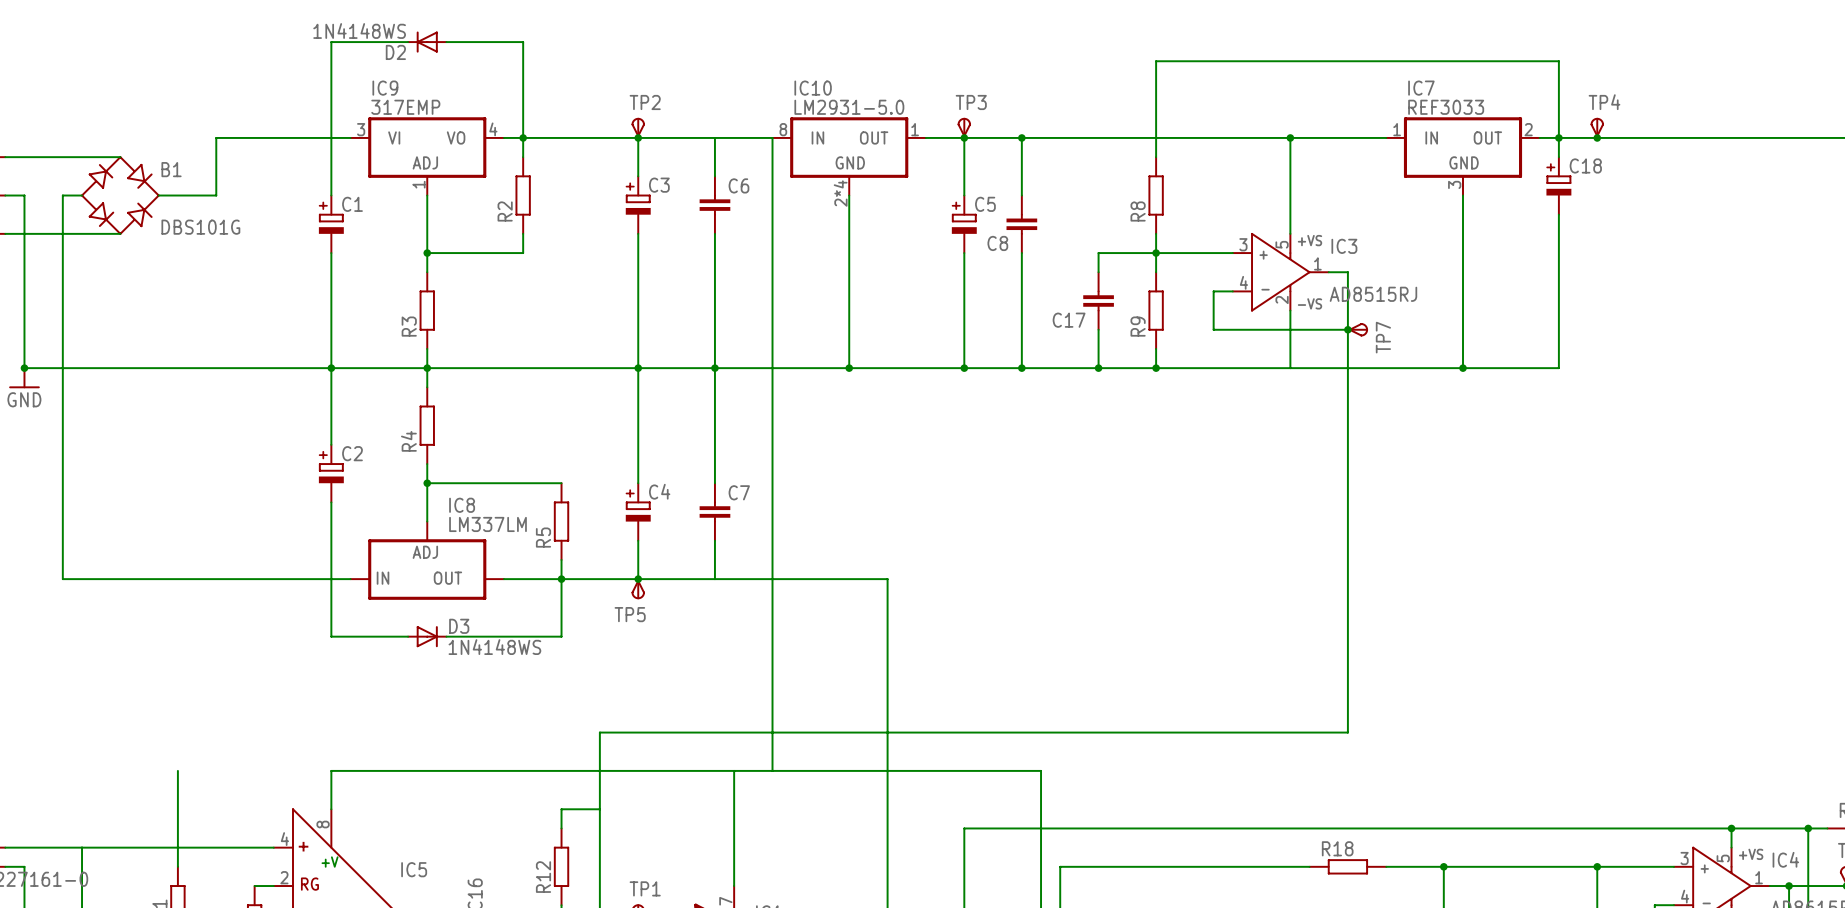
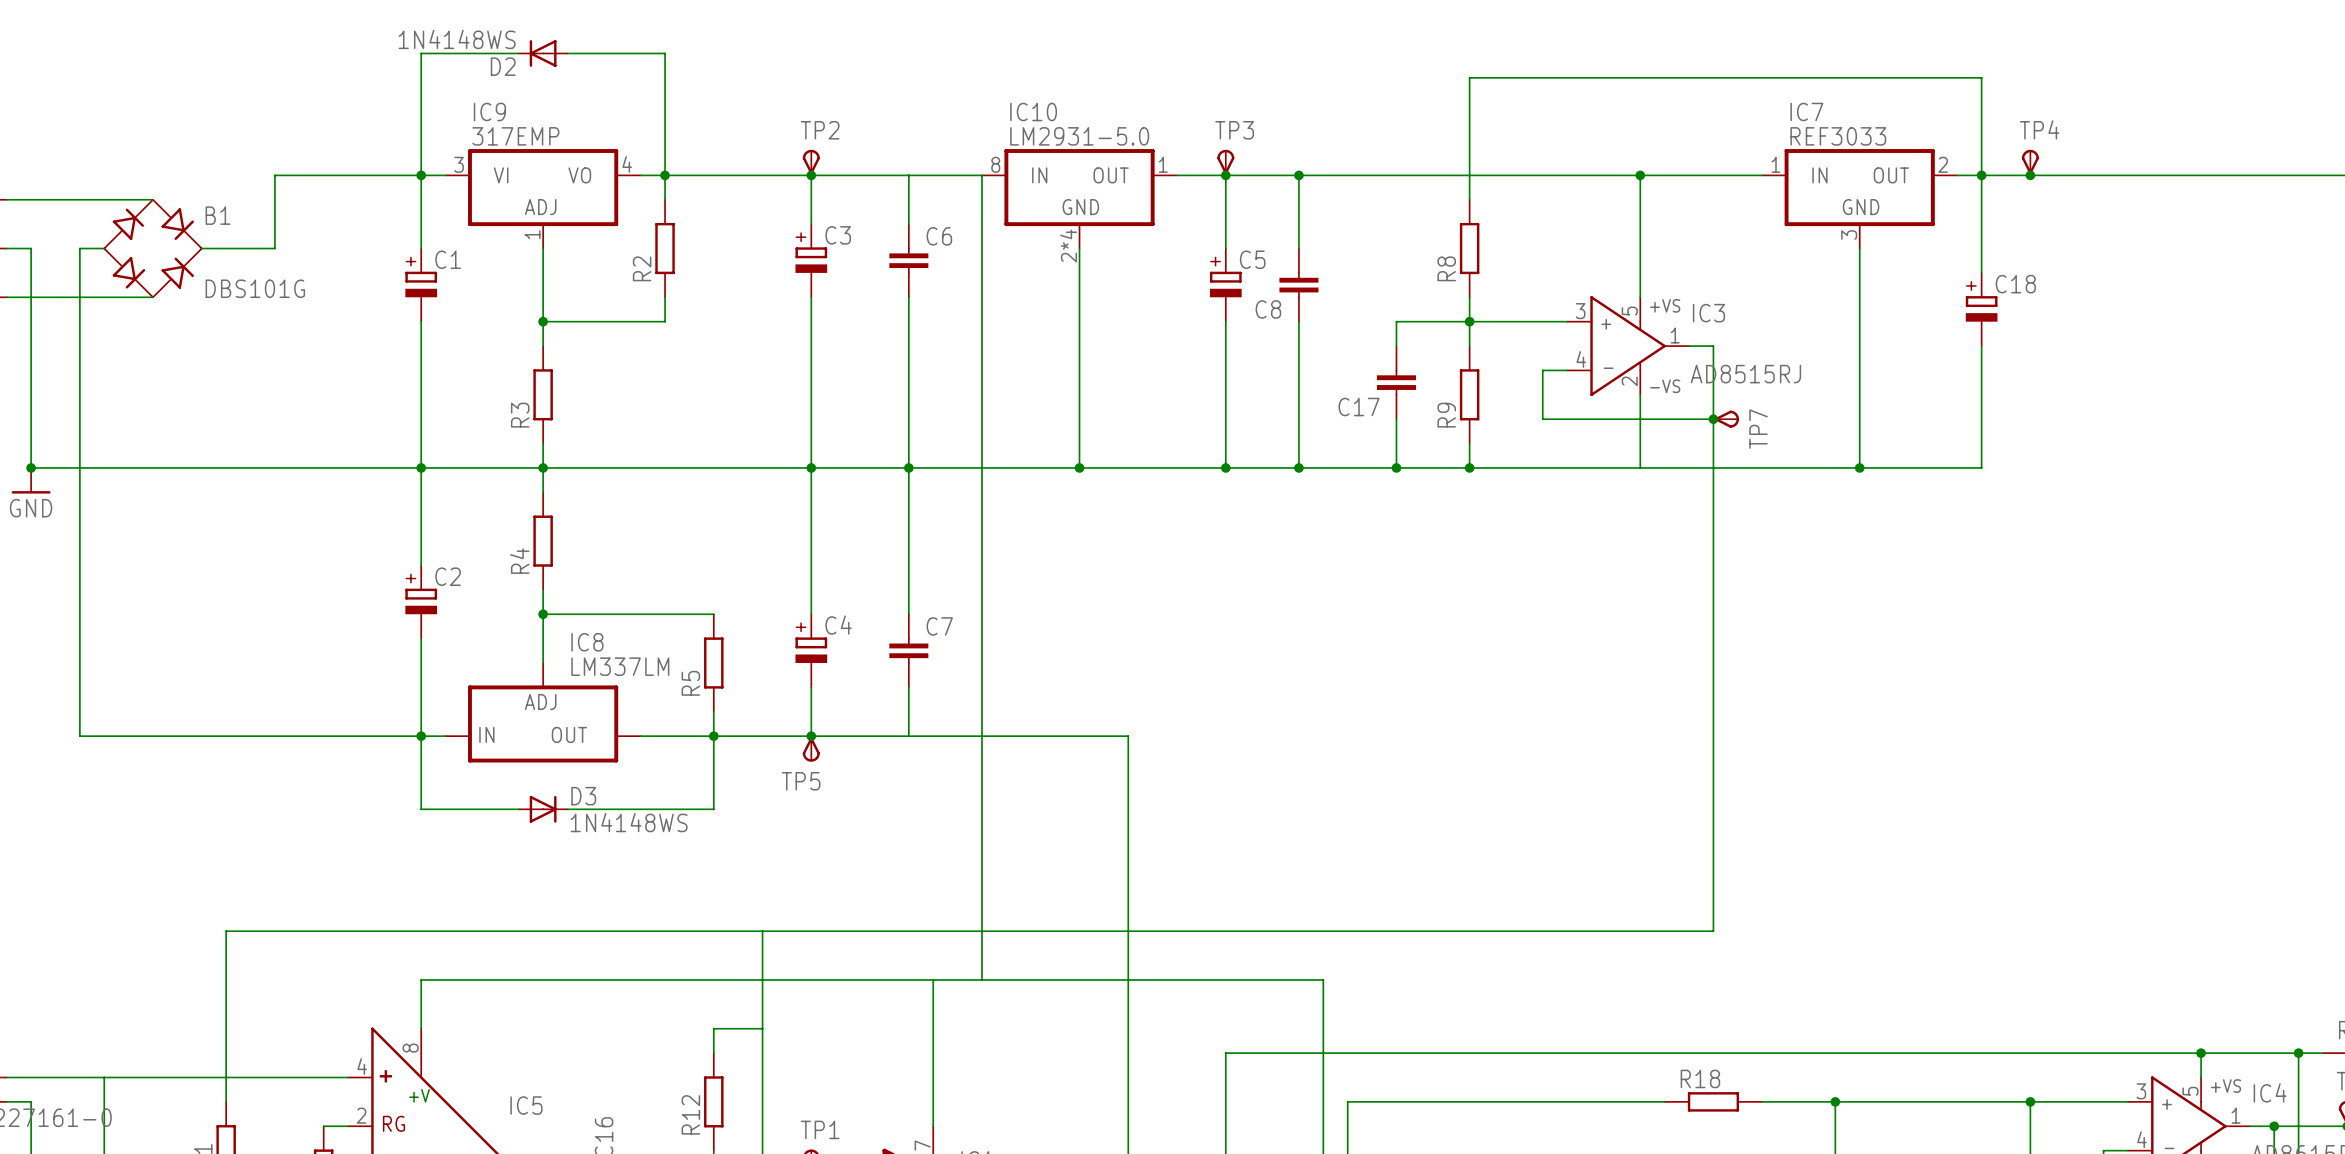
junction: none -> (421, 175)
C18 position: (1558, 185) -> (1981, 309)
junction: none -> (421, 736)
wire: none -> (762, 931) (226, 931) (226, 979)

